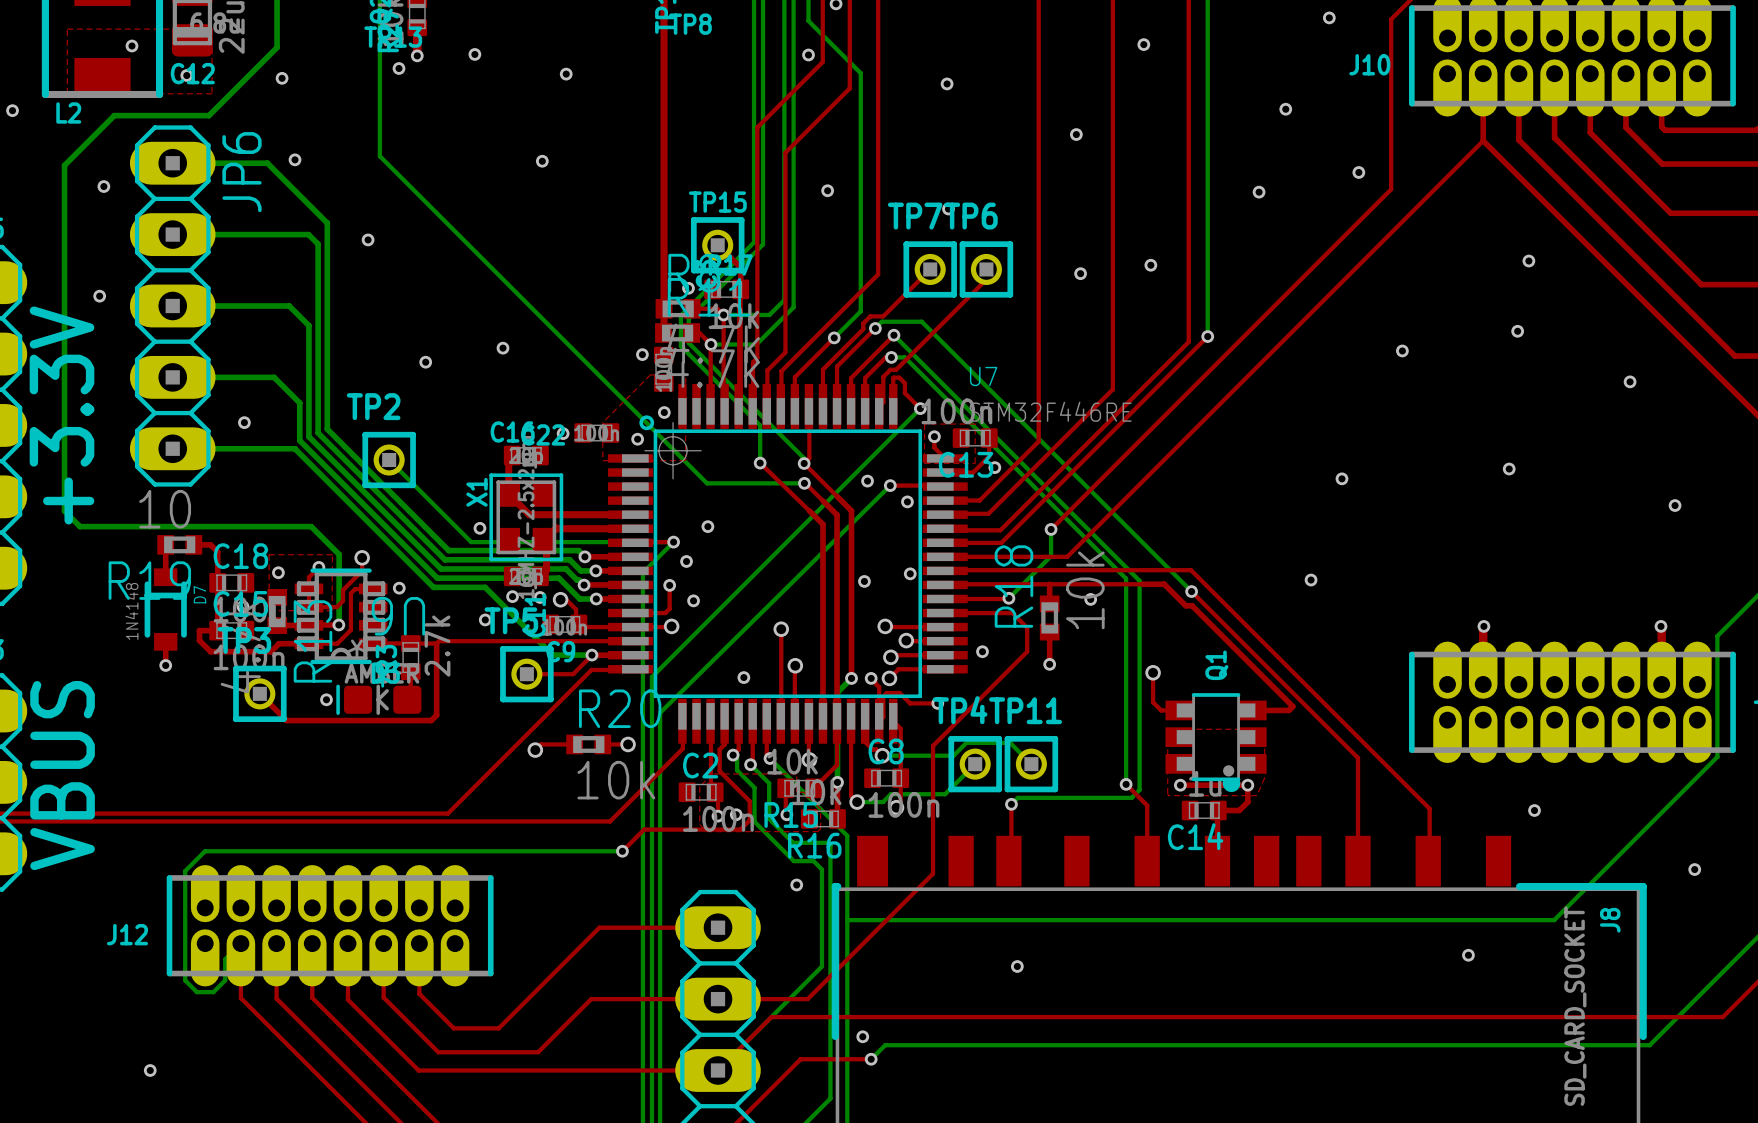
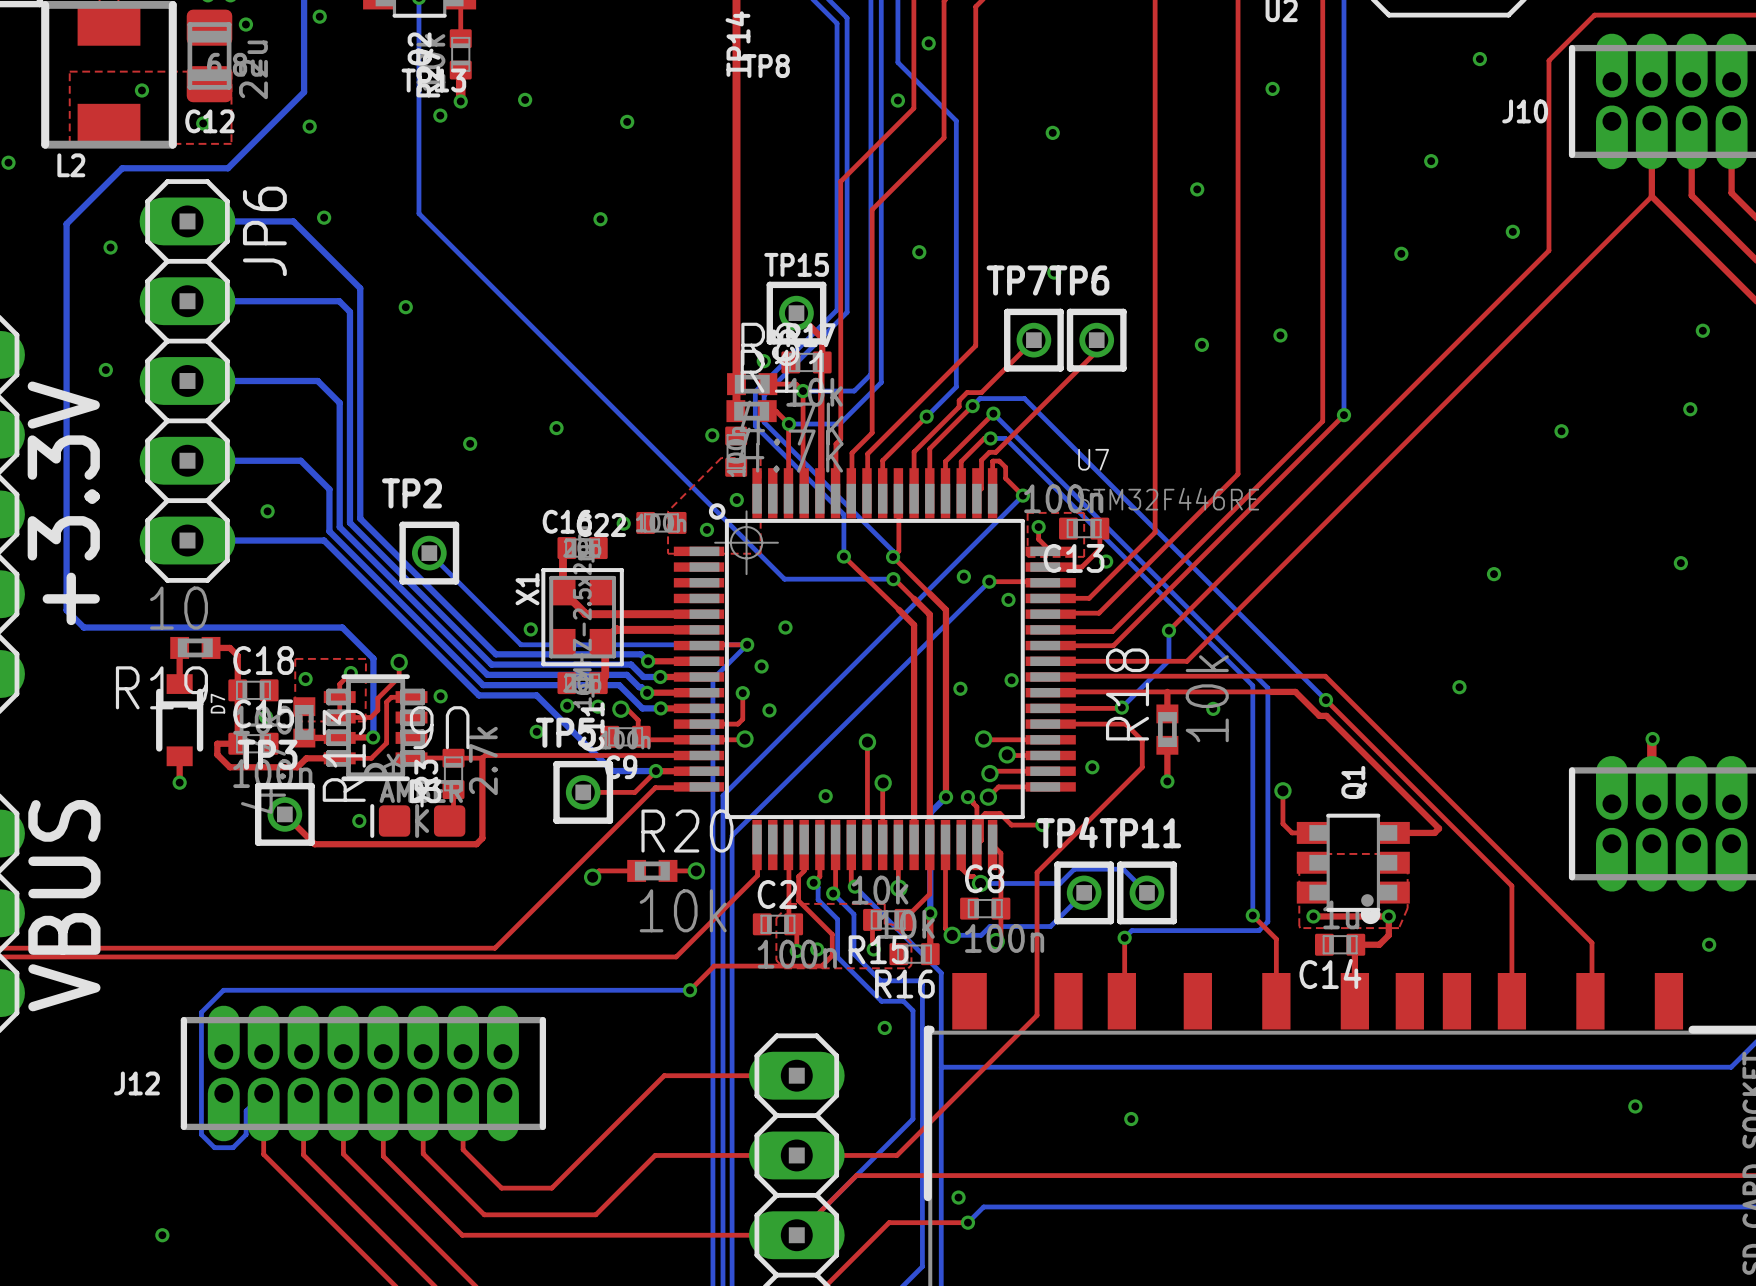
D7 value: 1N4148 (131, 611) -> none

